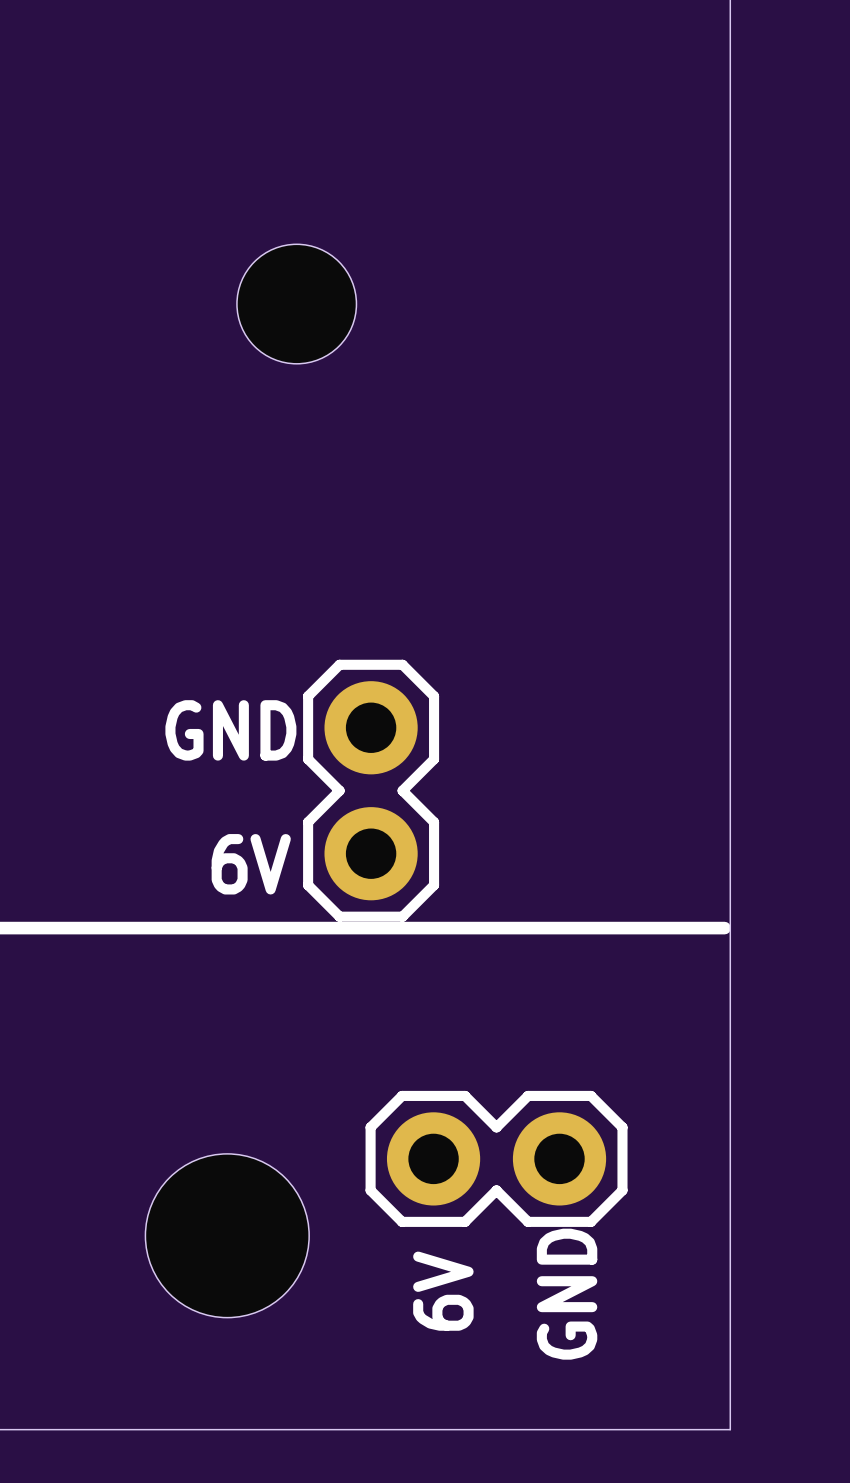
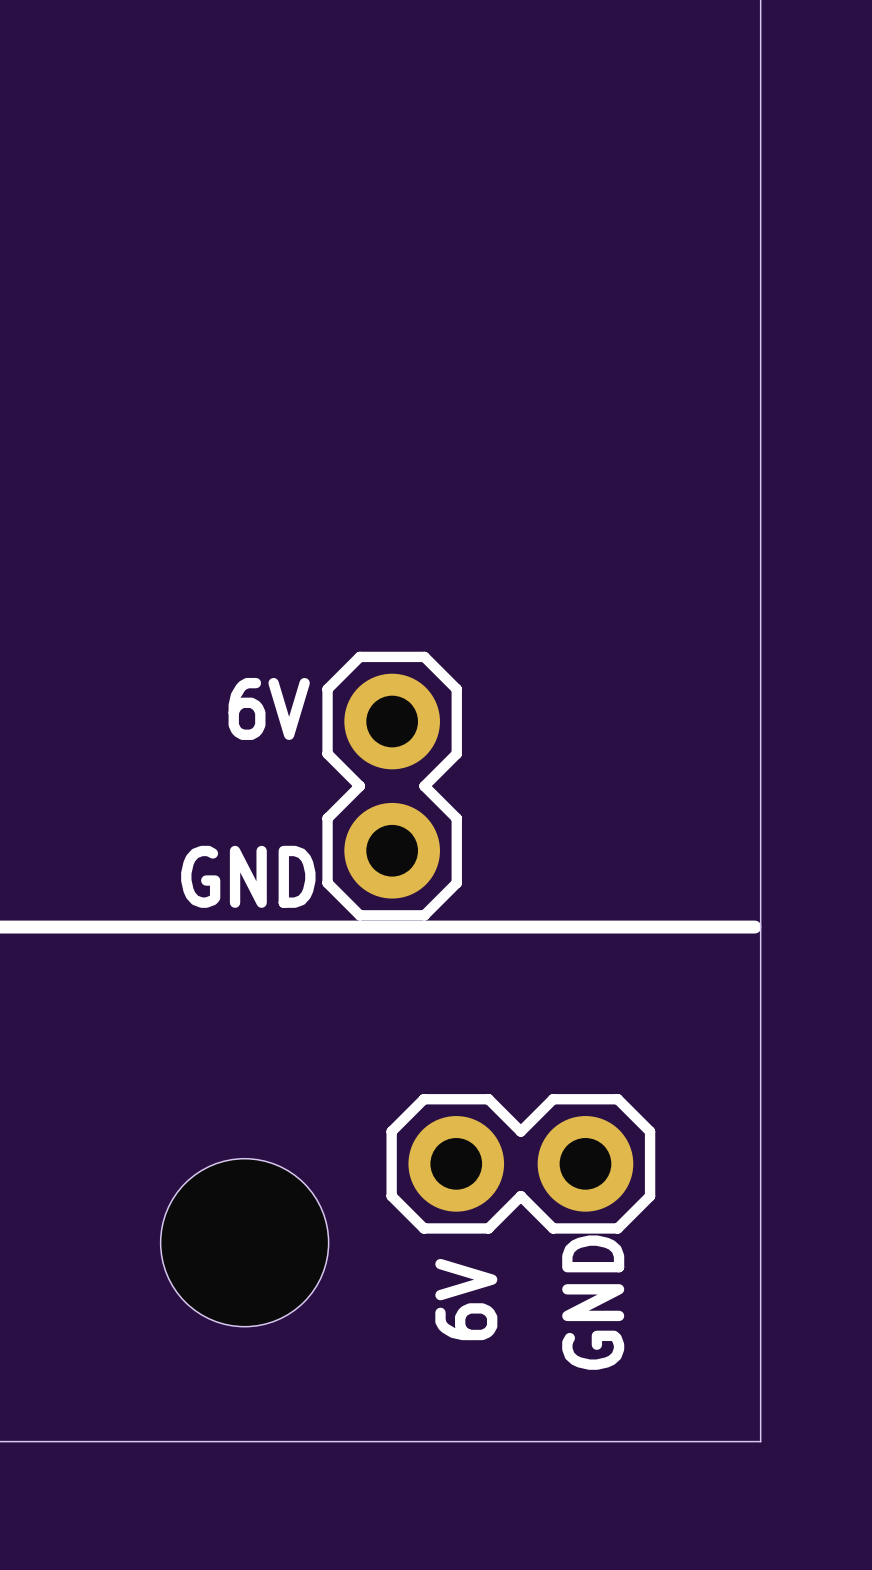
part: (296, 304) -> none
text position: GND (230, 730) -> GND (248, 876)
text position: 6V (251, 864) -> 6V (269, 708)

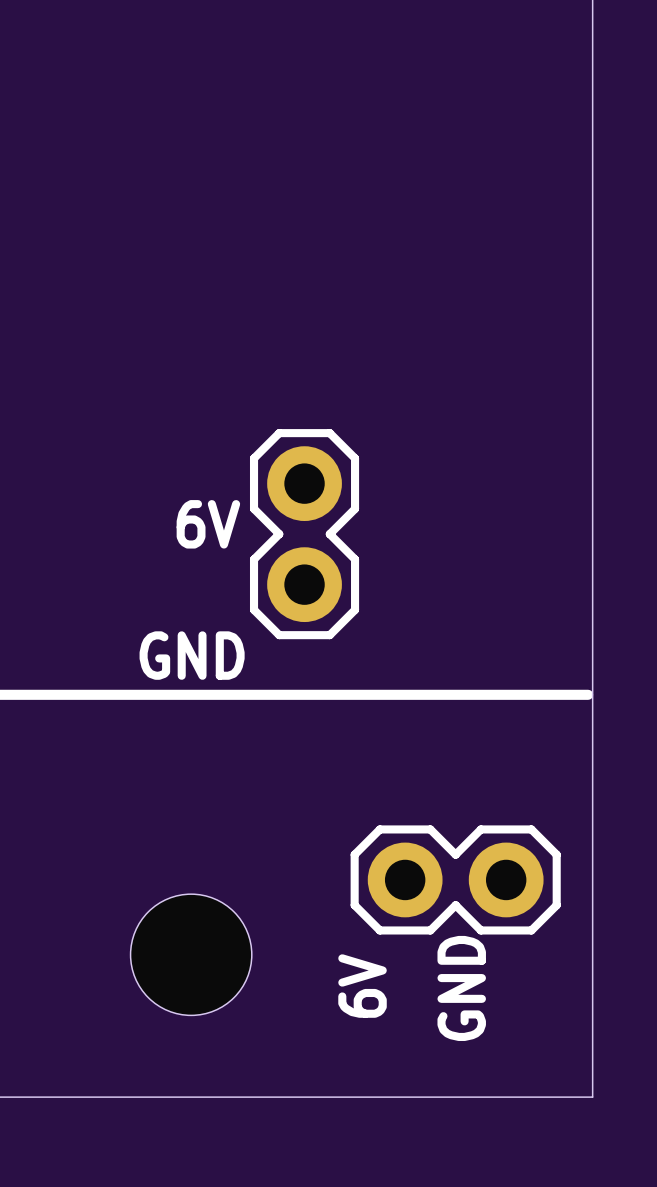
part position: (392, 786) -> (304, 534)
part footprint: [160, 1158, 329, 1327] -> [130, 894, 252, 1016]
part position: (520, 1163) -> (455, 879)

